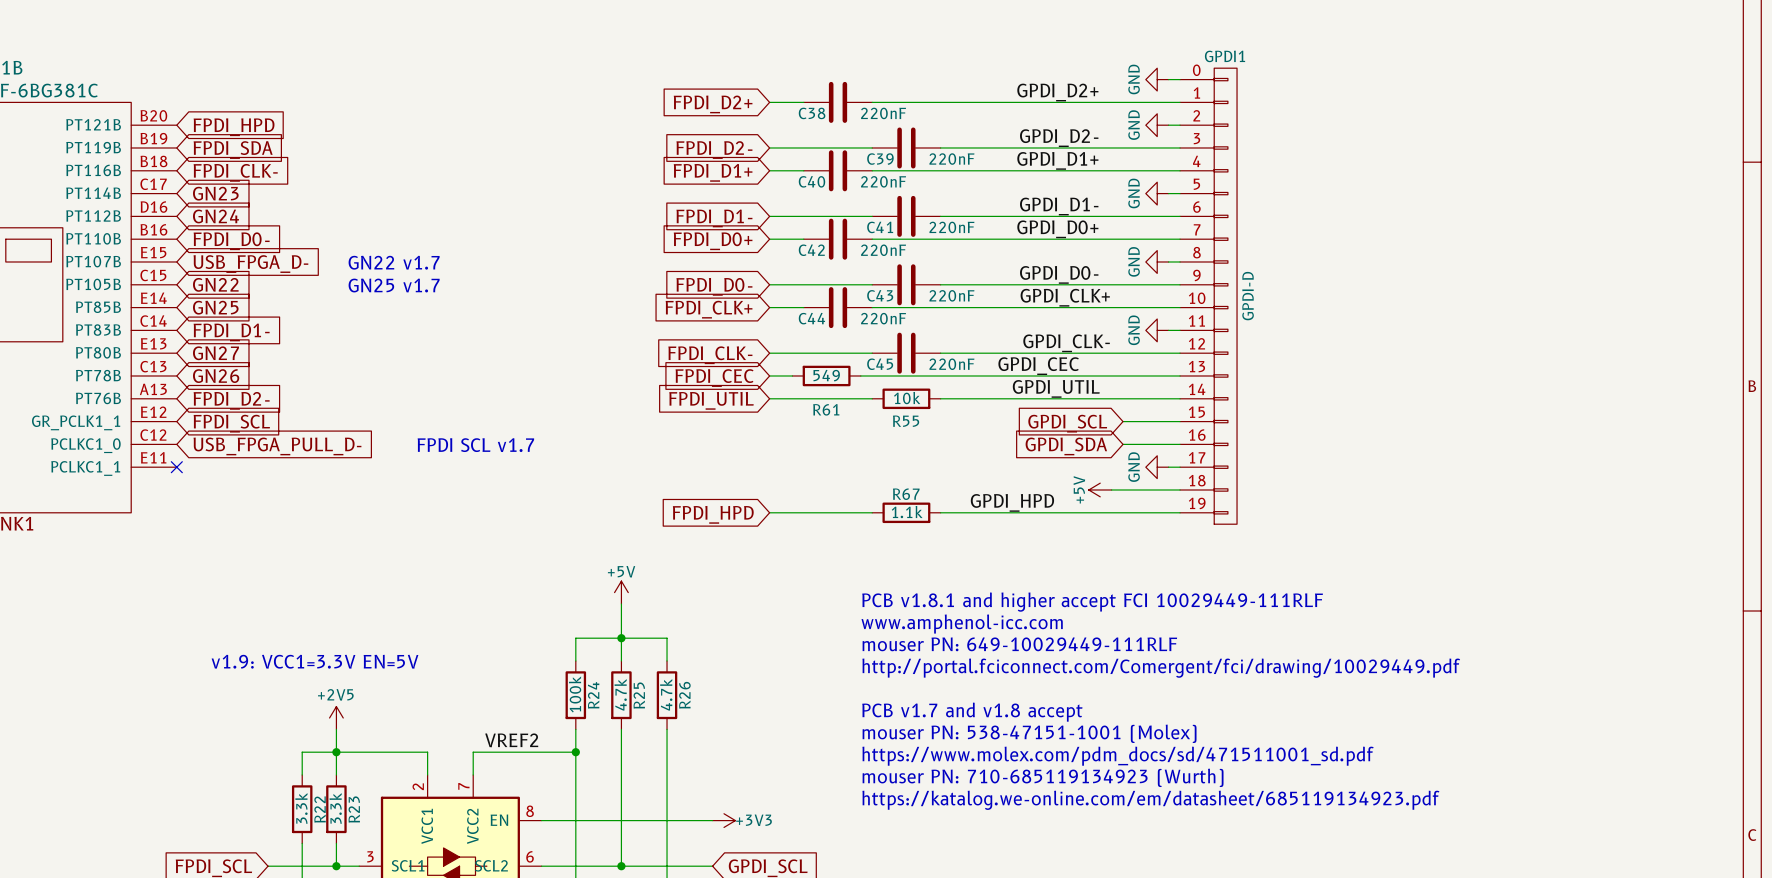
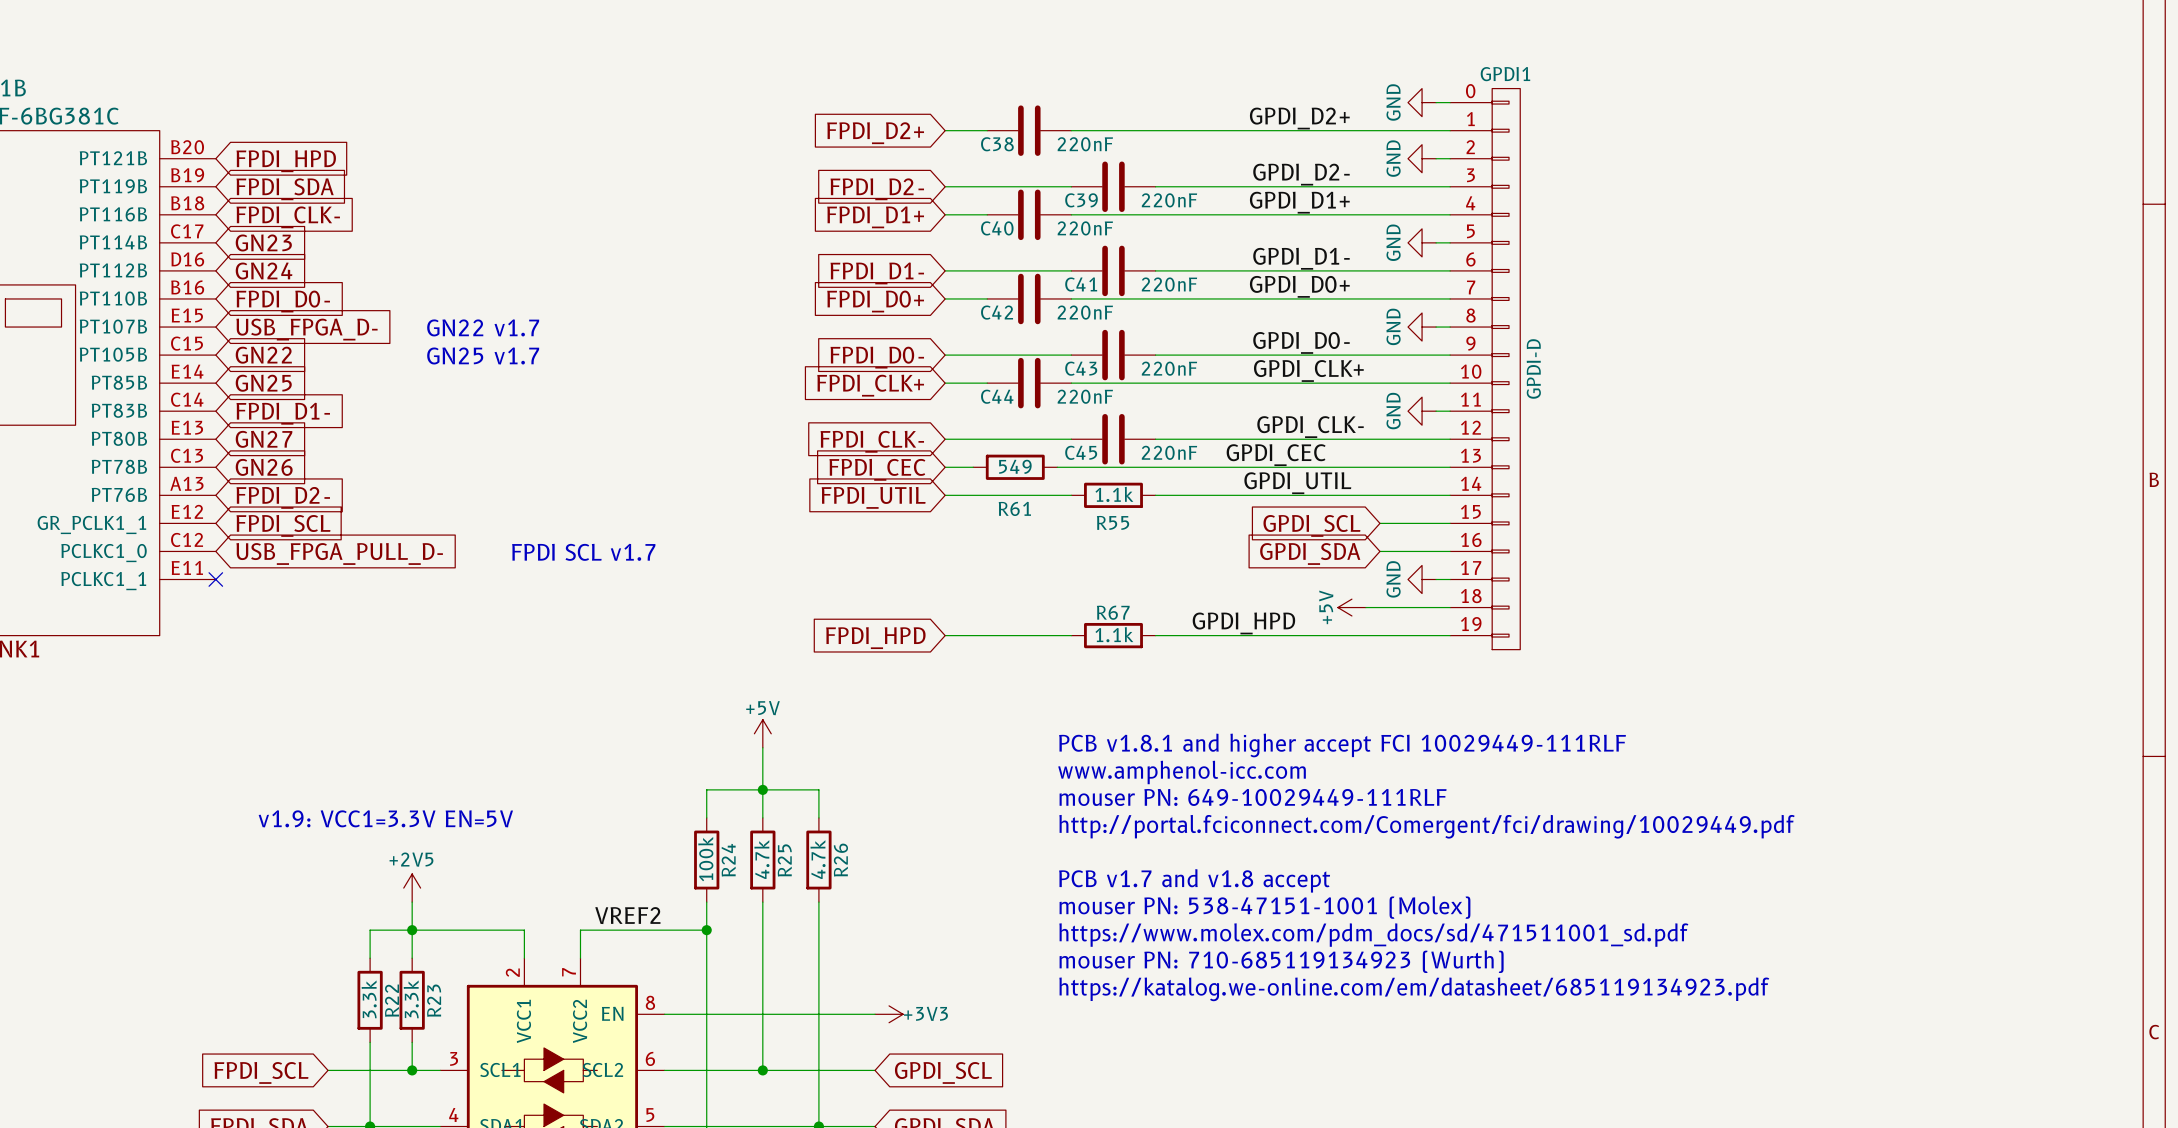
R55 value: 10k (907, 398) -> 1.1k (1114, 494)

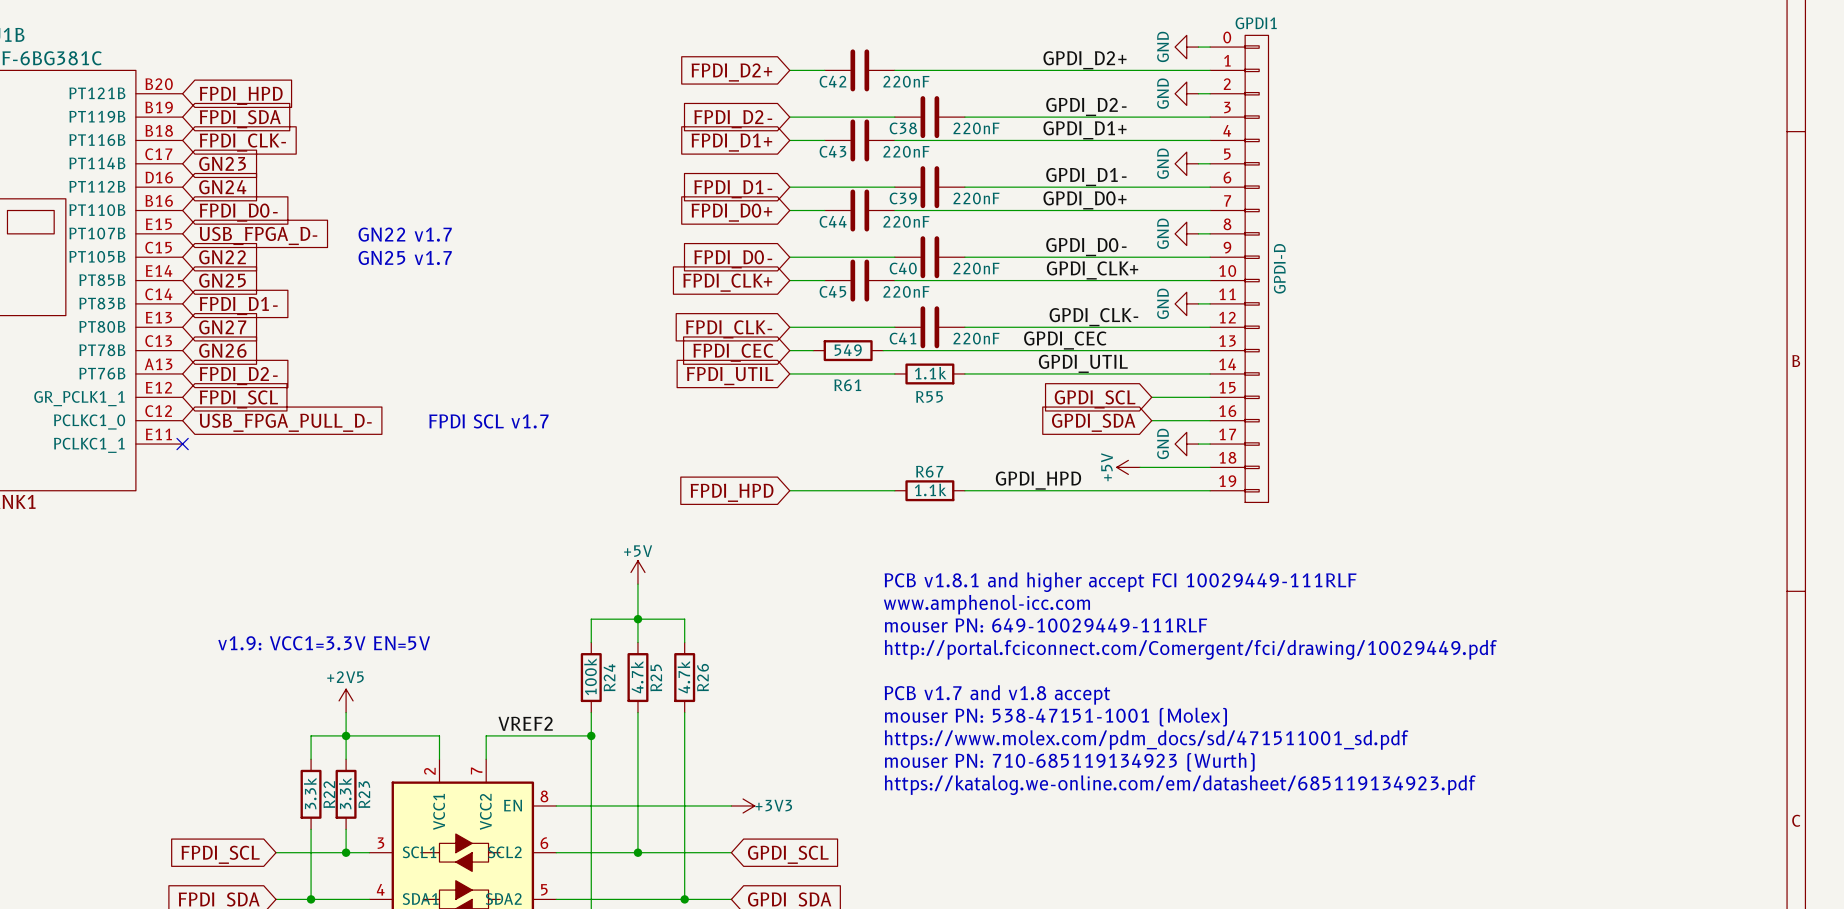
C38 name: C38 (997, 144) -> C42 (832, 81)
C39 name: C39 (1081, 200) -> C38 (903, 128)
C40 name: C40 (997, 228) -> C43 (832, 151)
C41 name: C41 (1081, 284) -> C39 (903, 198)
C42 name: C42 (997, 312) -> C44 (833, 221)
C43 name: C43 (1081, 368) -> C40 (903, 268)
C44 name: C44 (997, 396) -> C45 (832, 291)
C45 name: C45 (1081, 452) -> C41 (902, 338)

